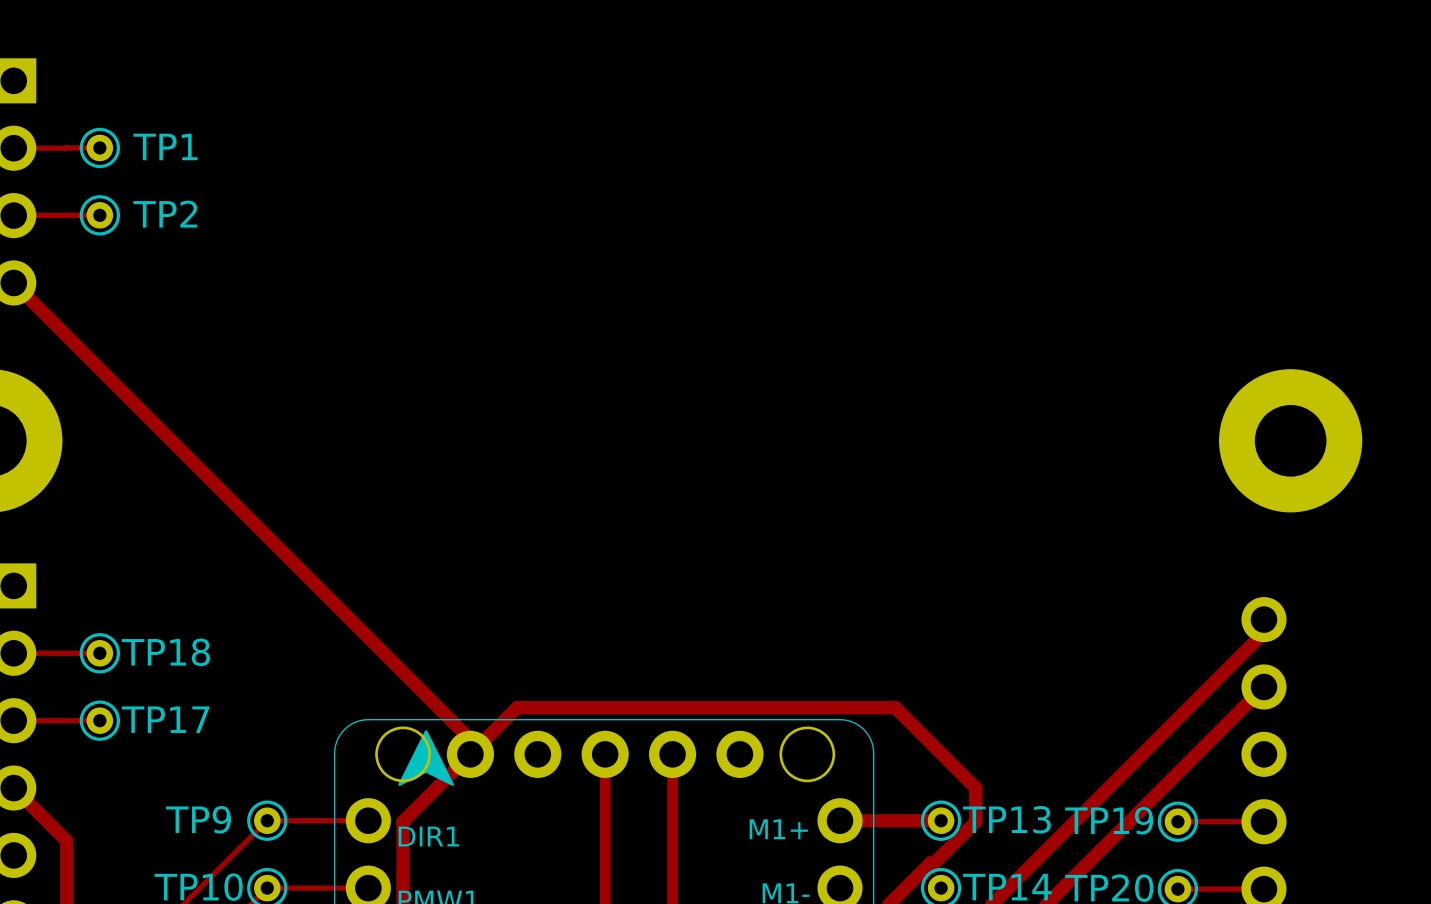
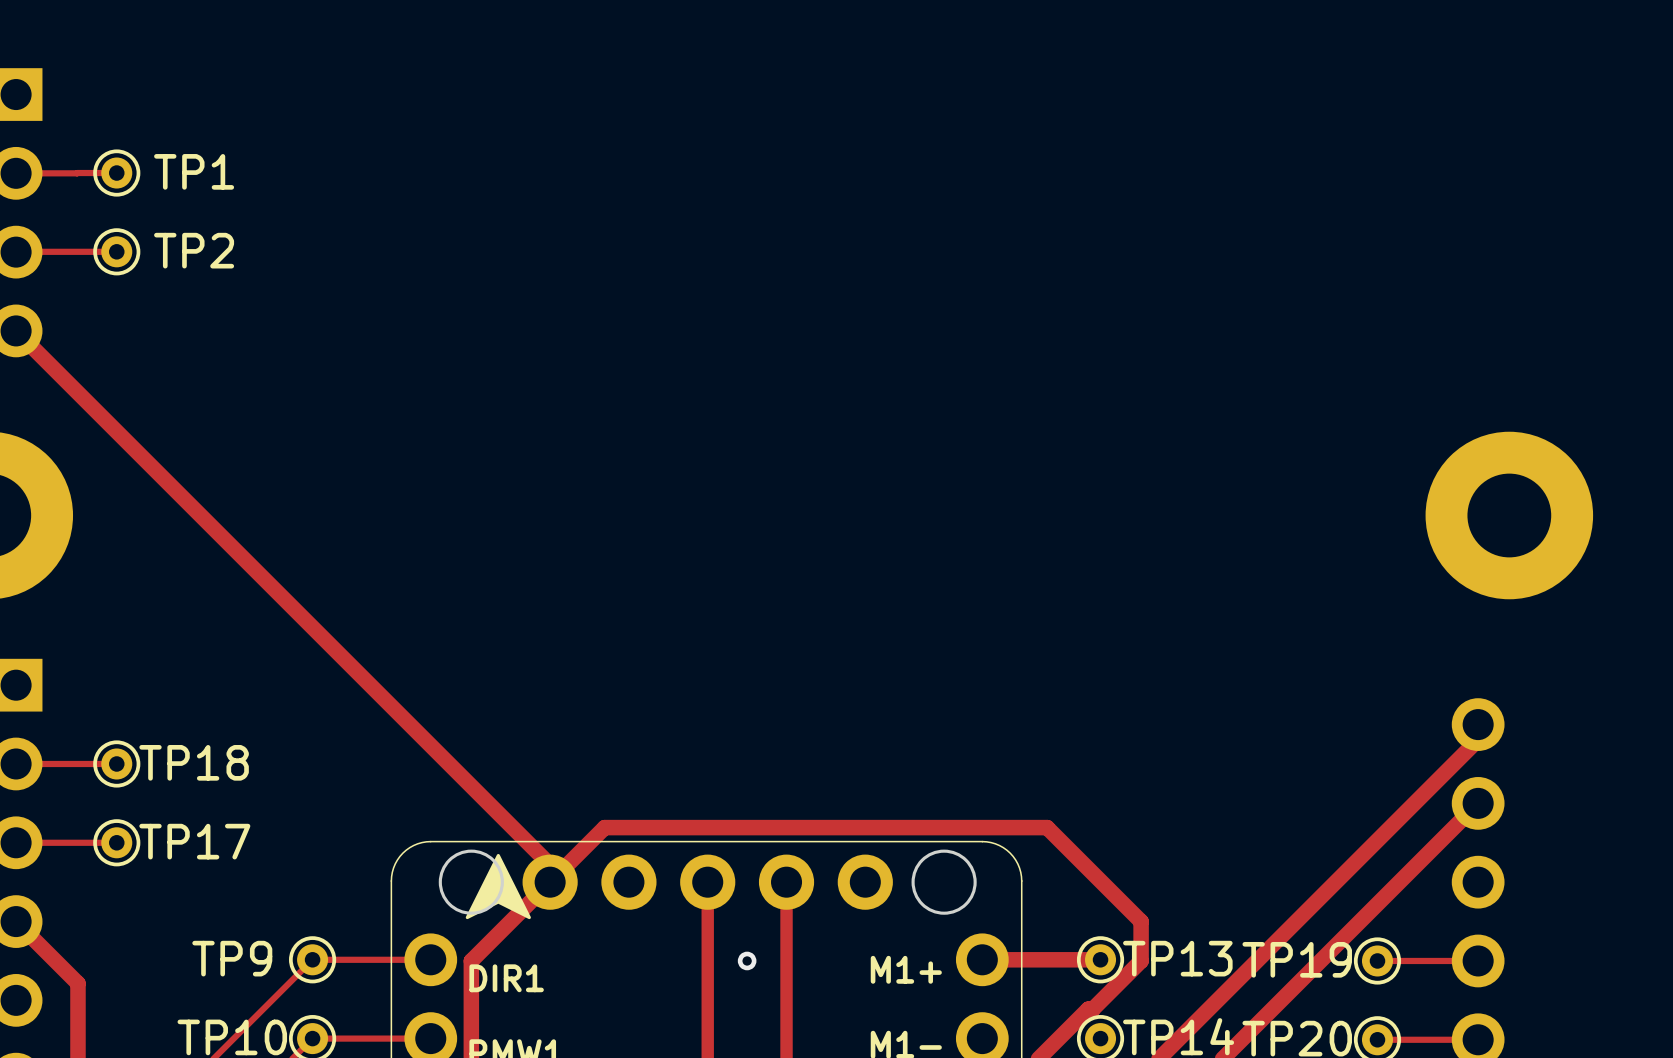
via: none -> (747, 960)

